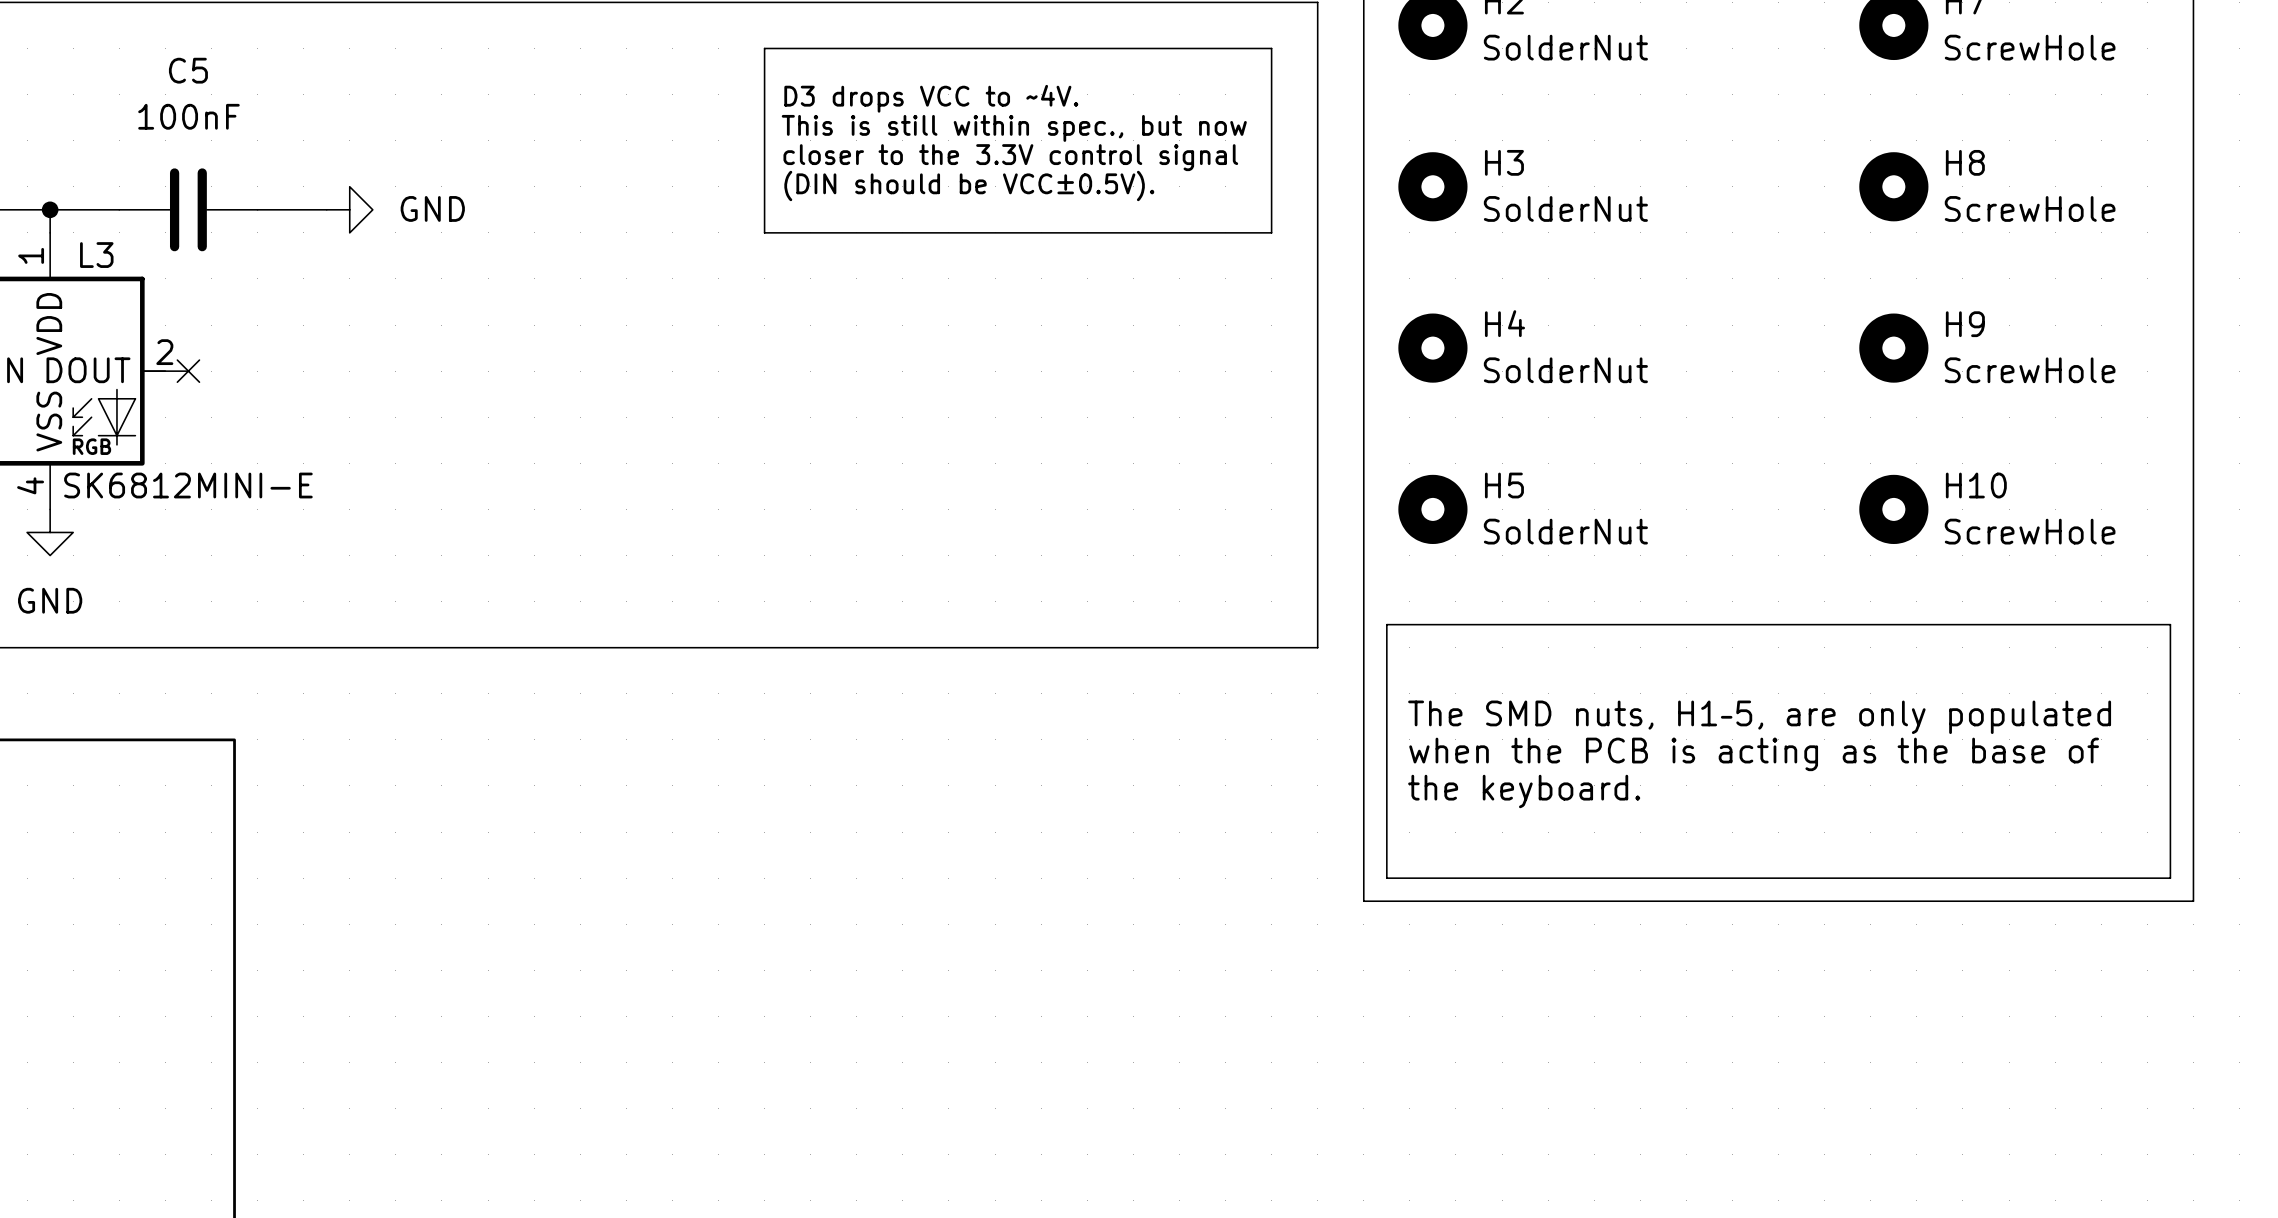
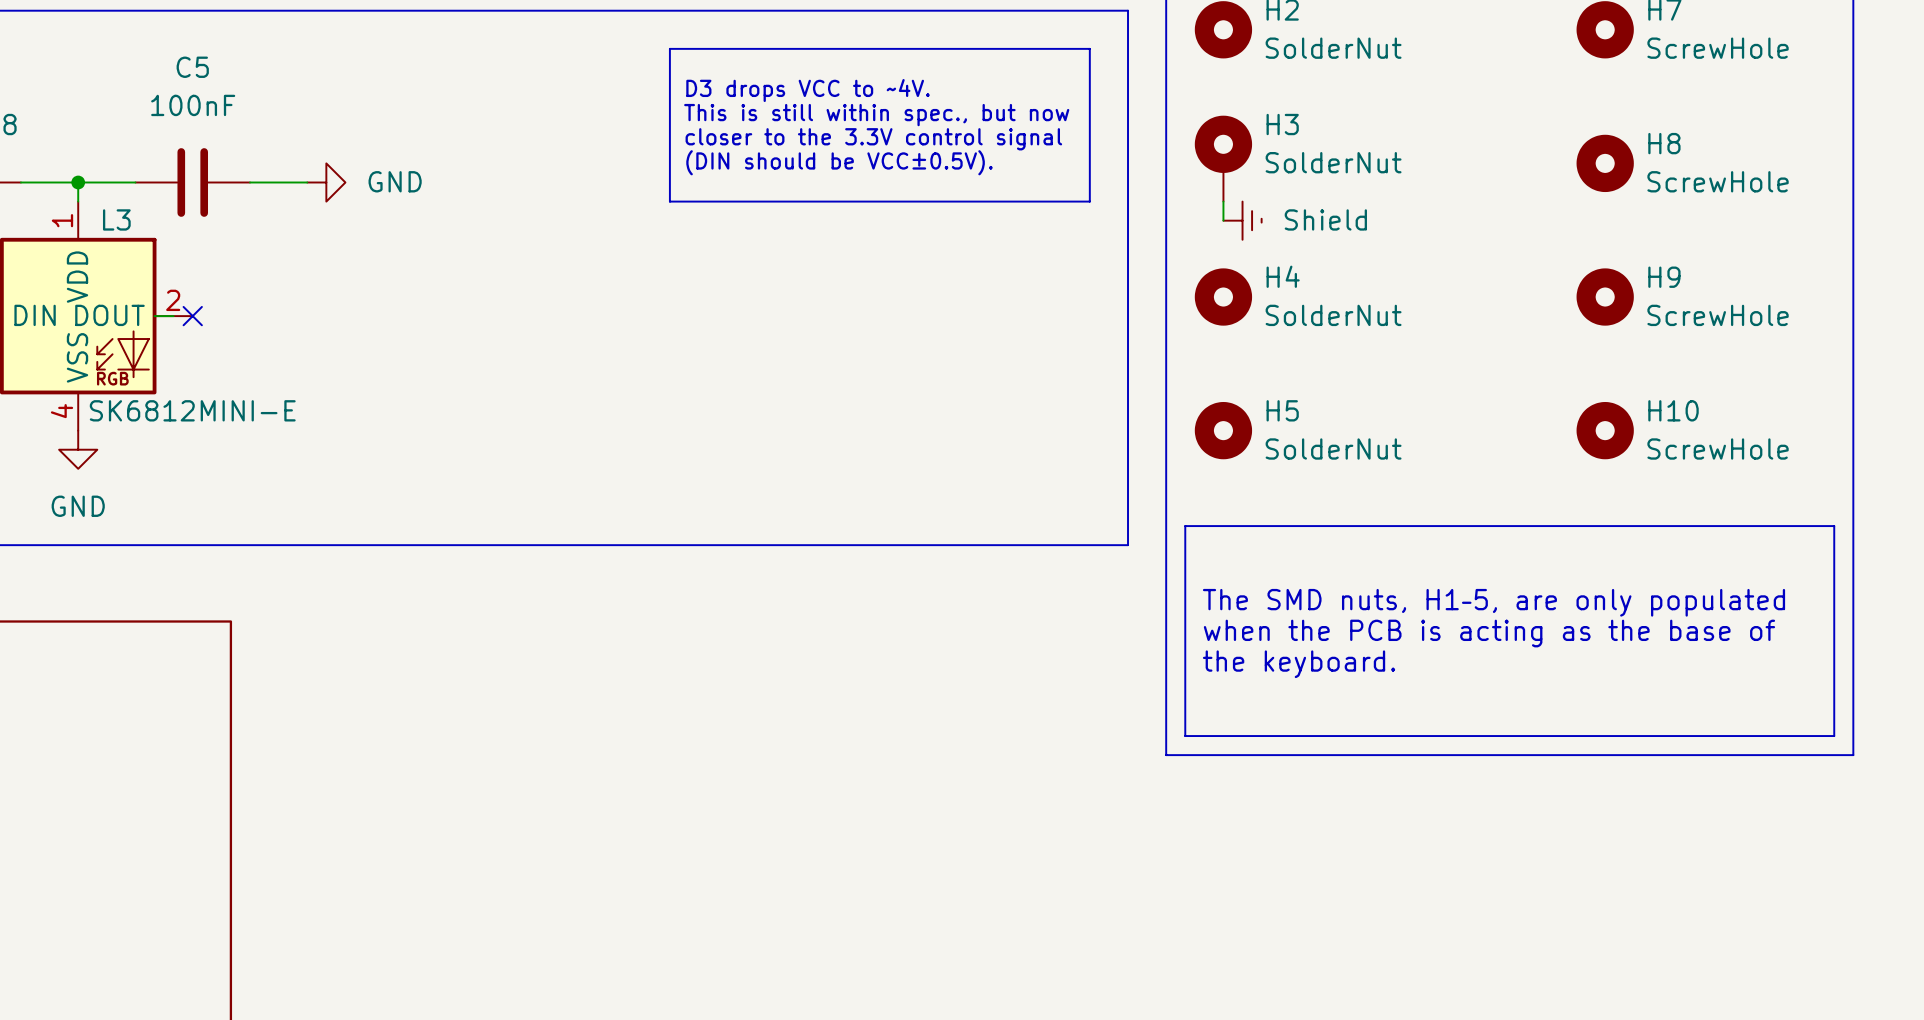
H3 symbol: [1398, 152, 1468, 222] -> [1194, 115, 1253, 202]
wire: none -> (1223, 201) (1223, 220)
power symbol: none -> Shield (1242, 220)

